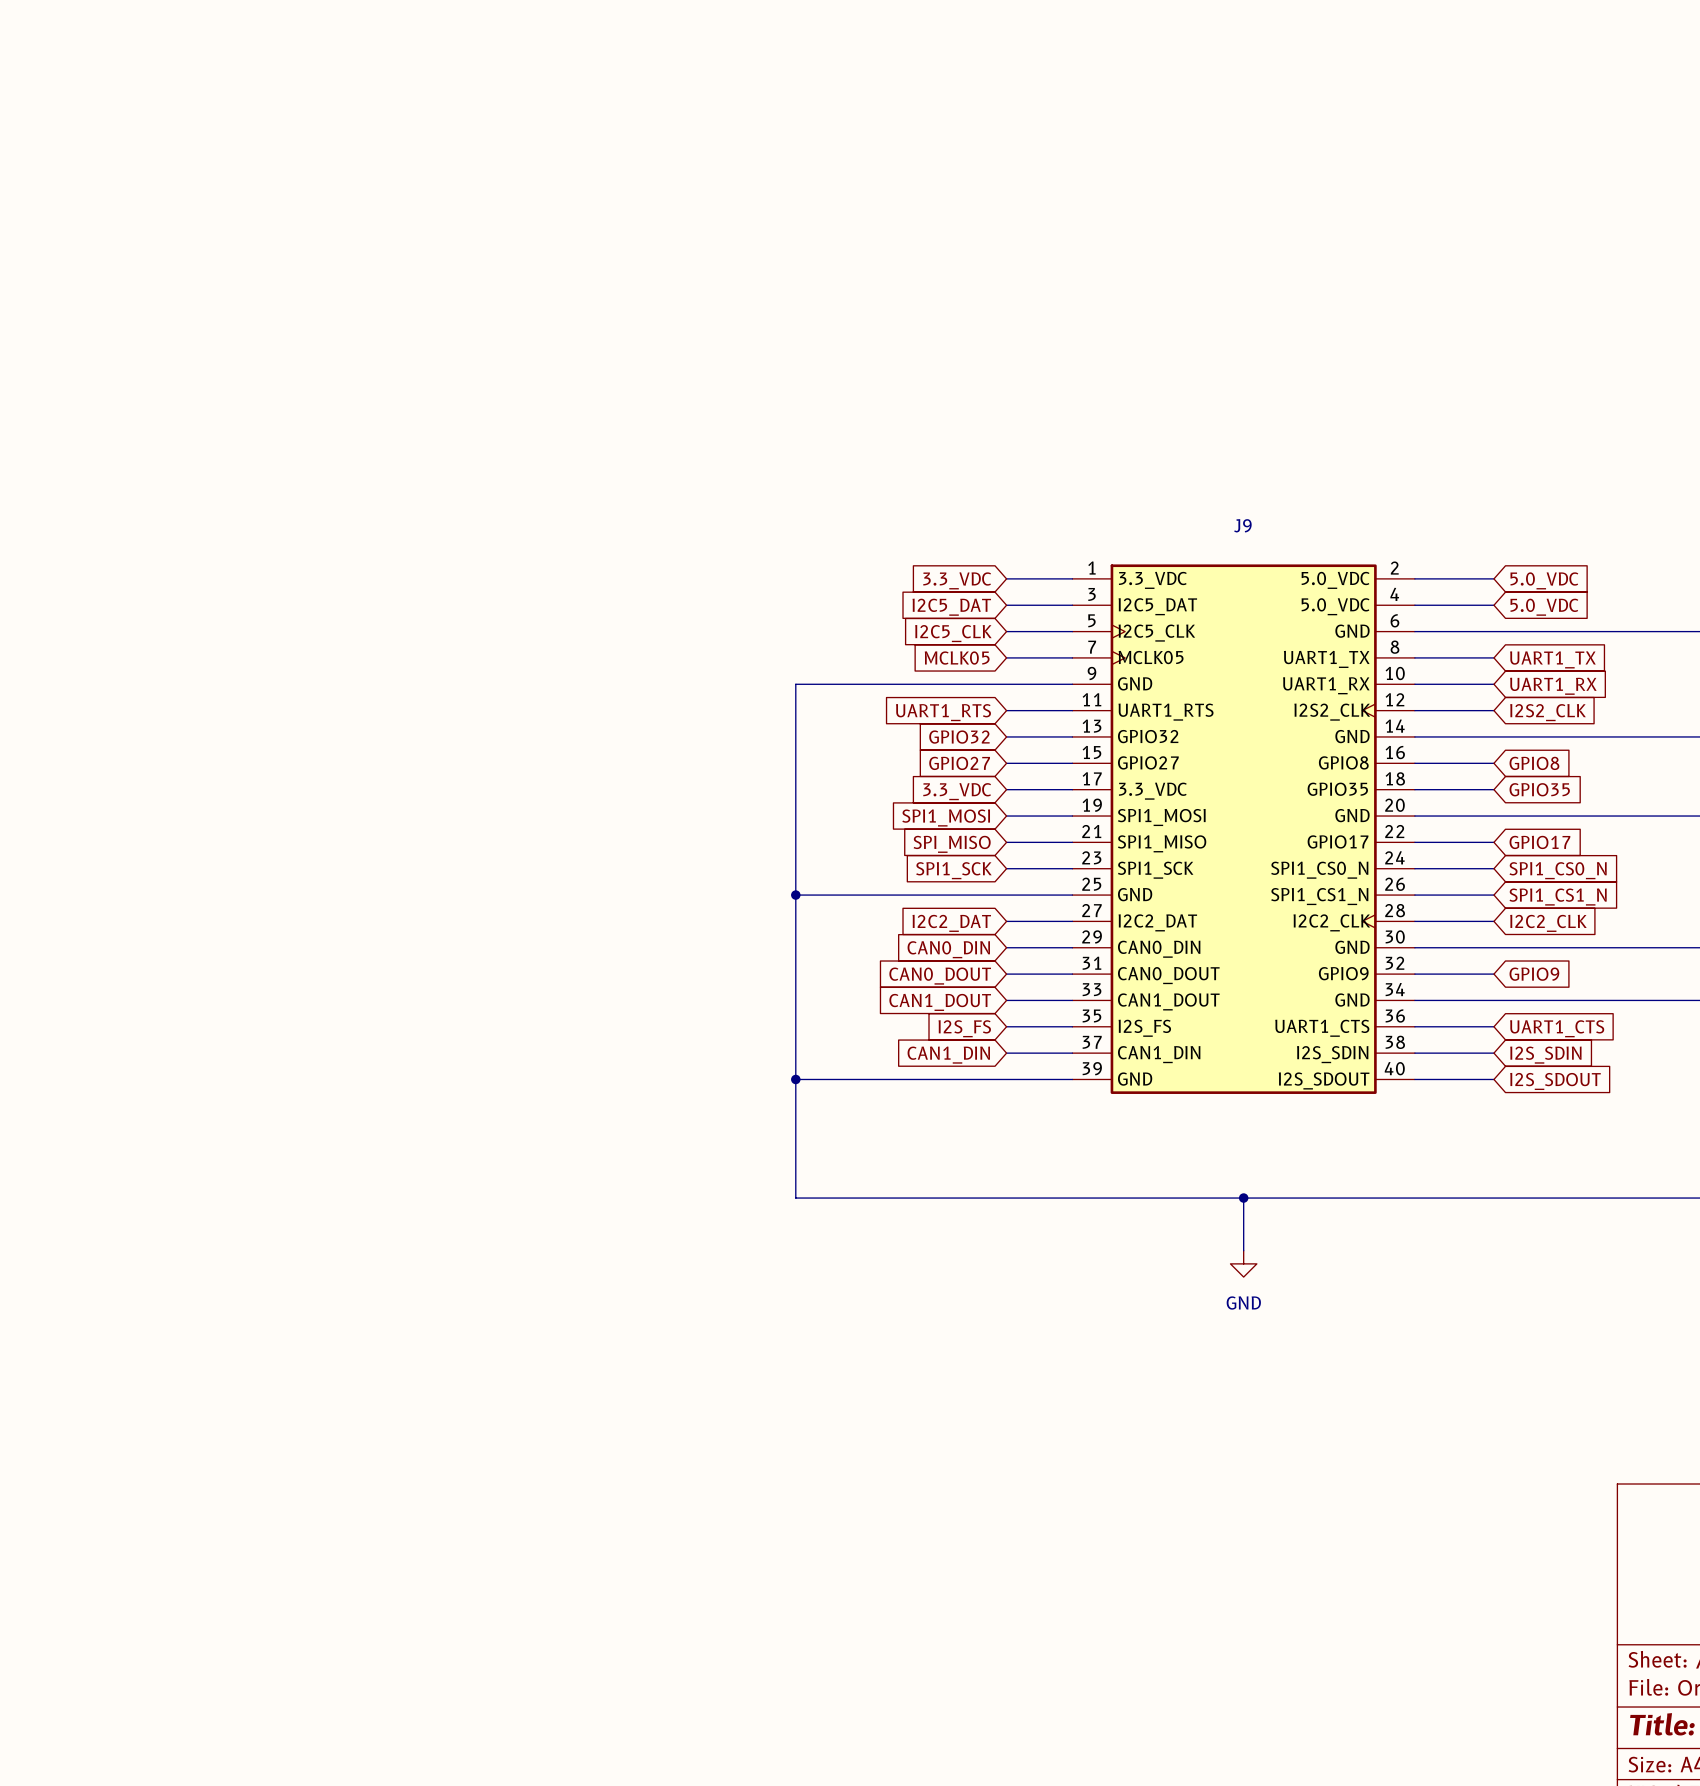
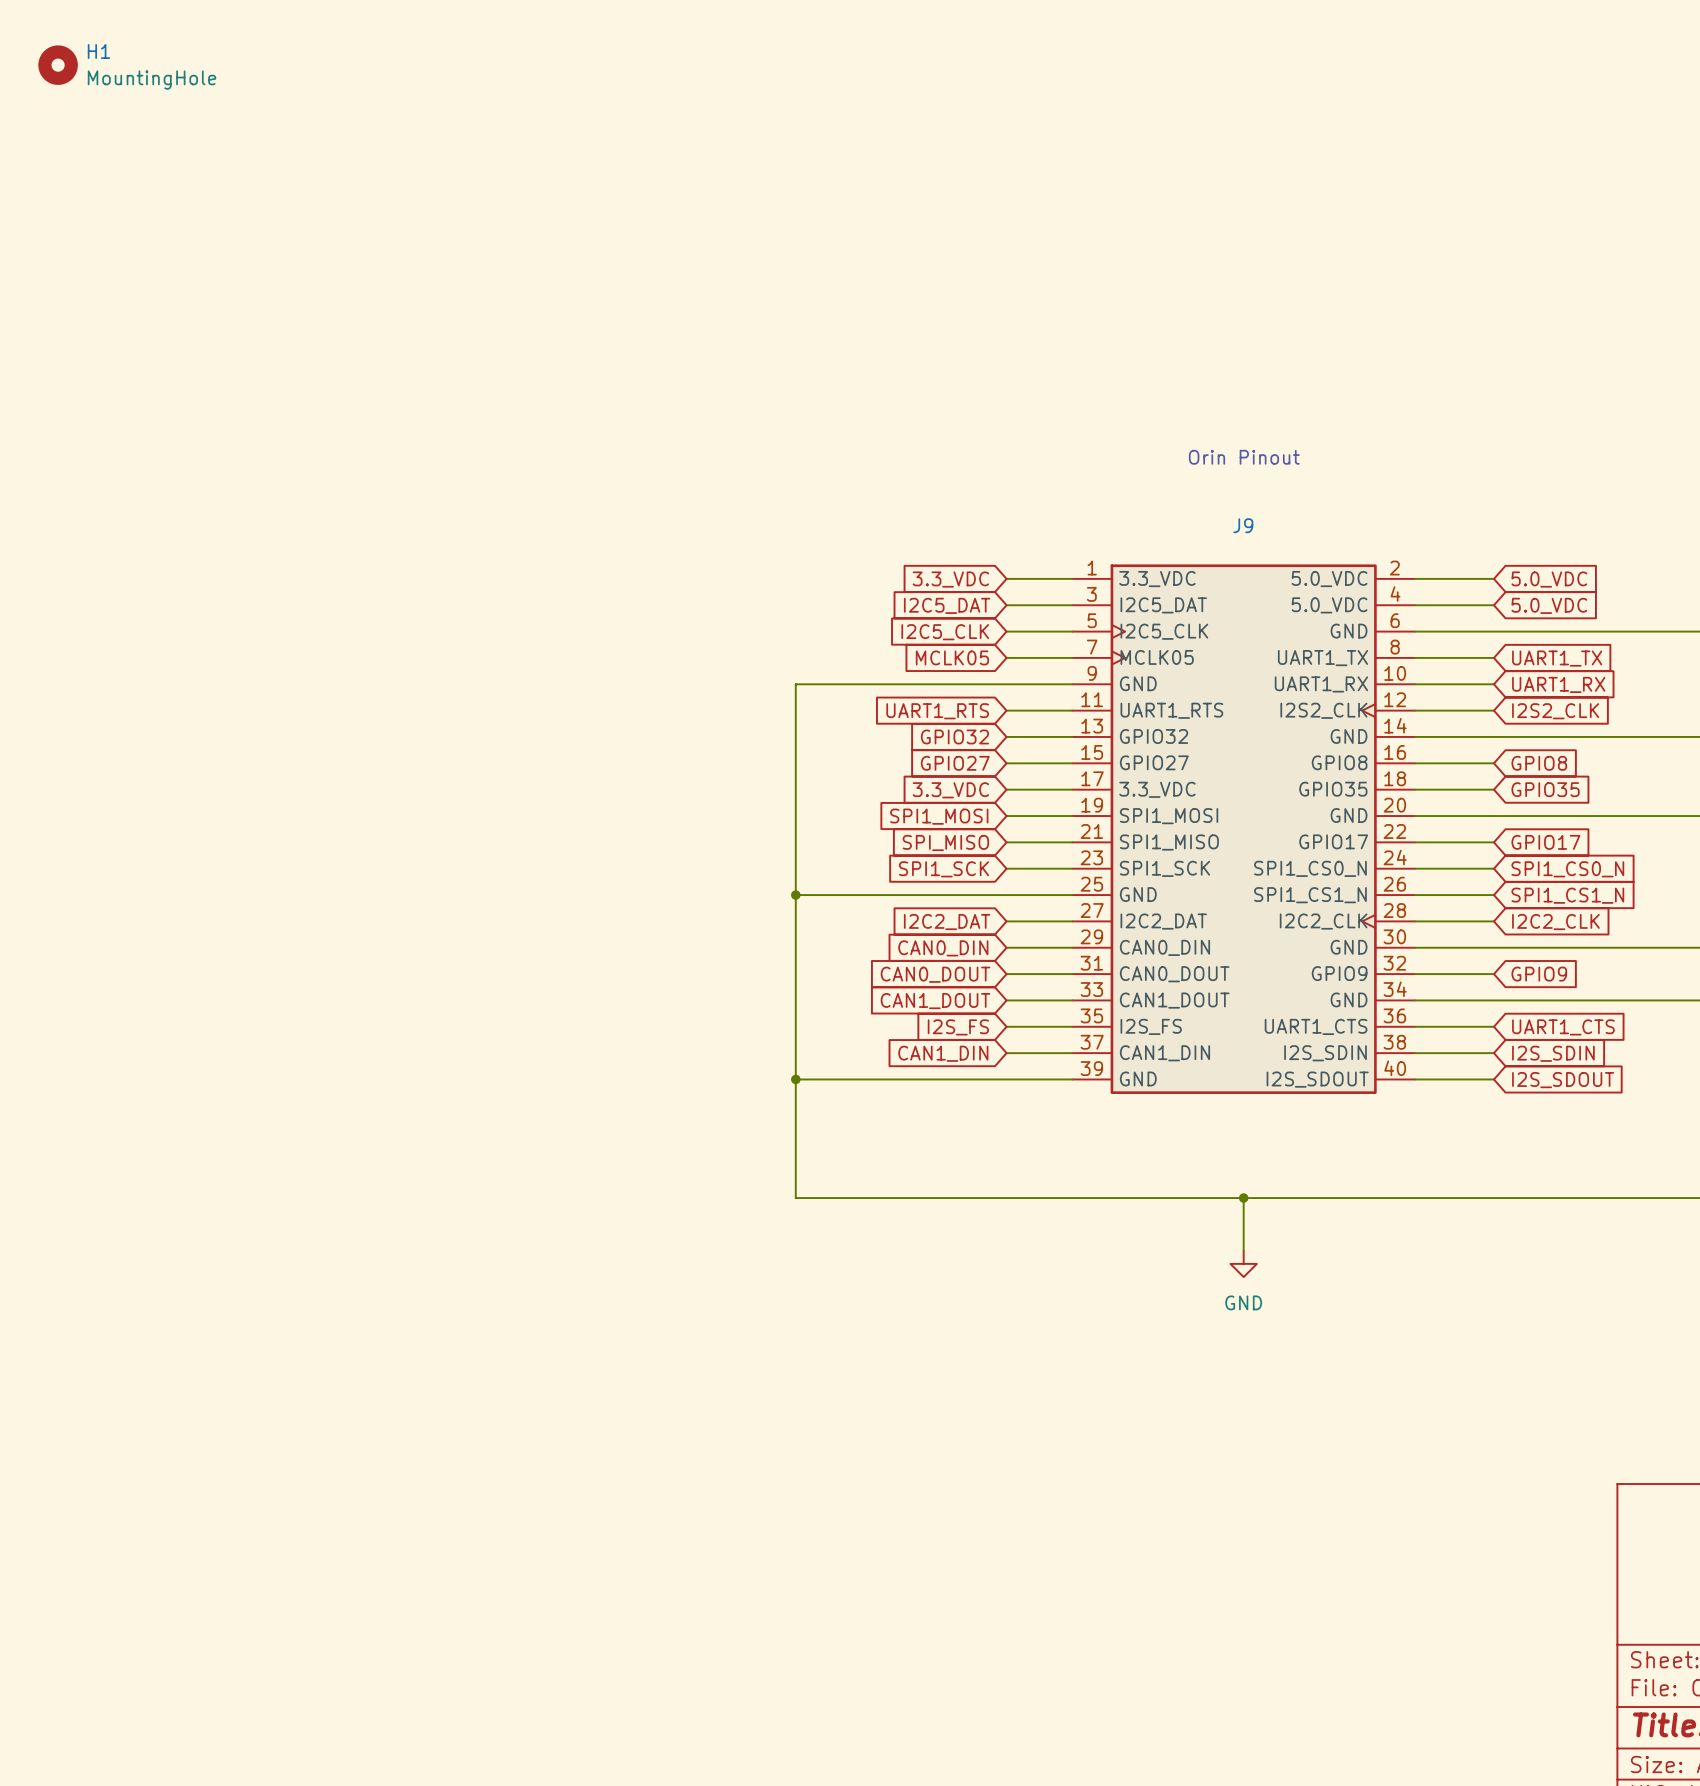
H1: none -> MountingHole (58, 65)
text: none -> Orin Pinout (1244, 457)

